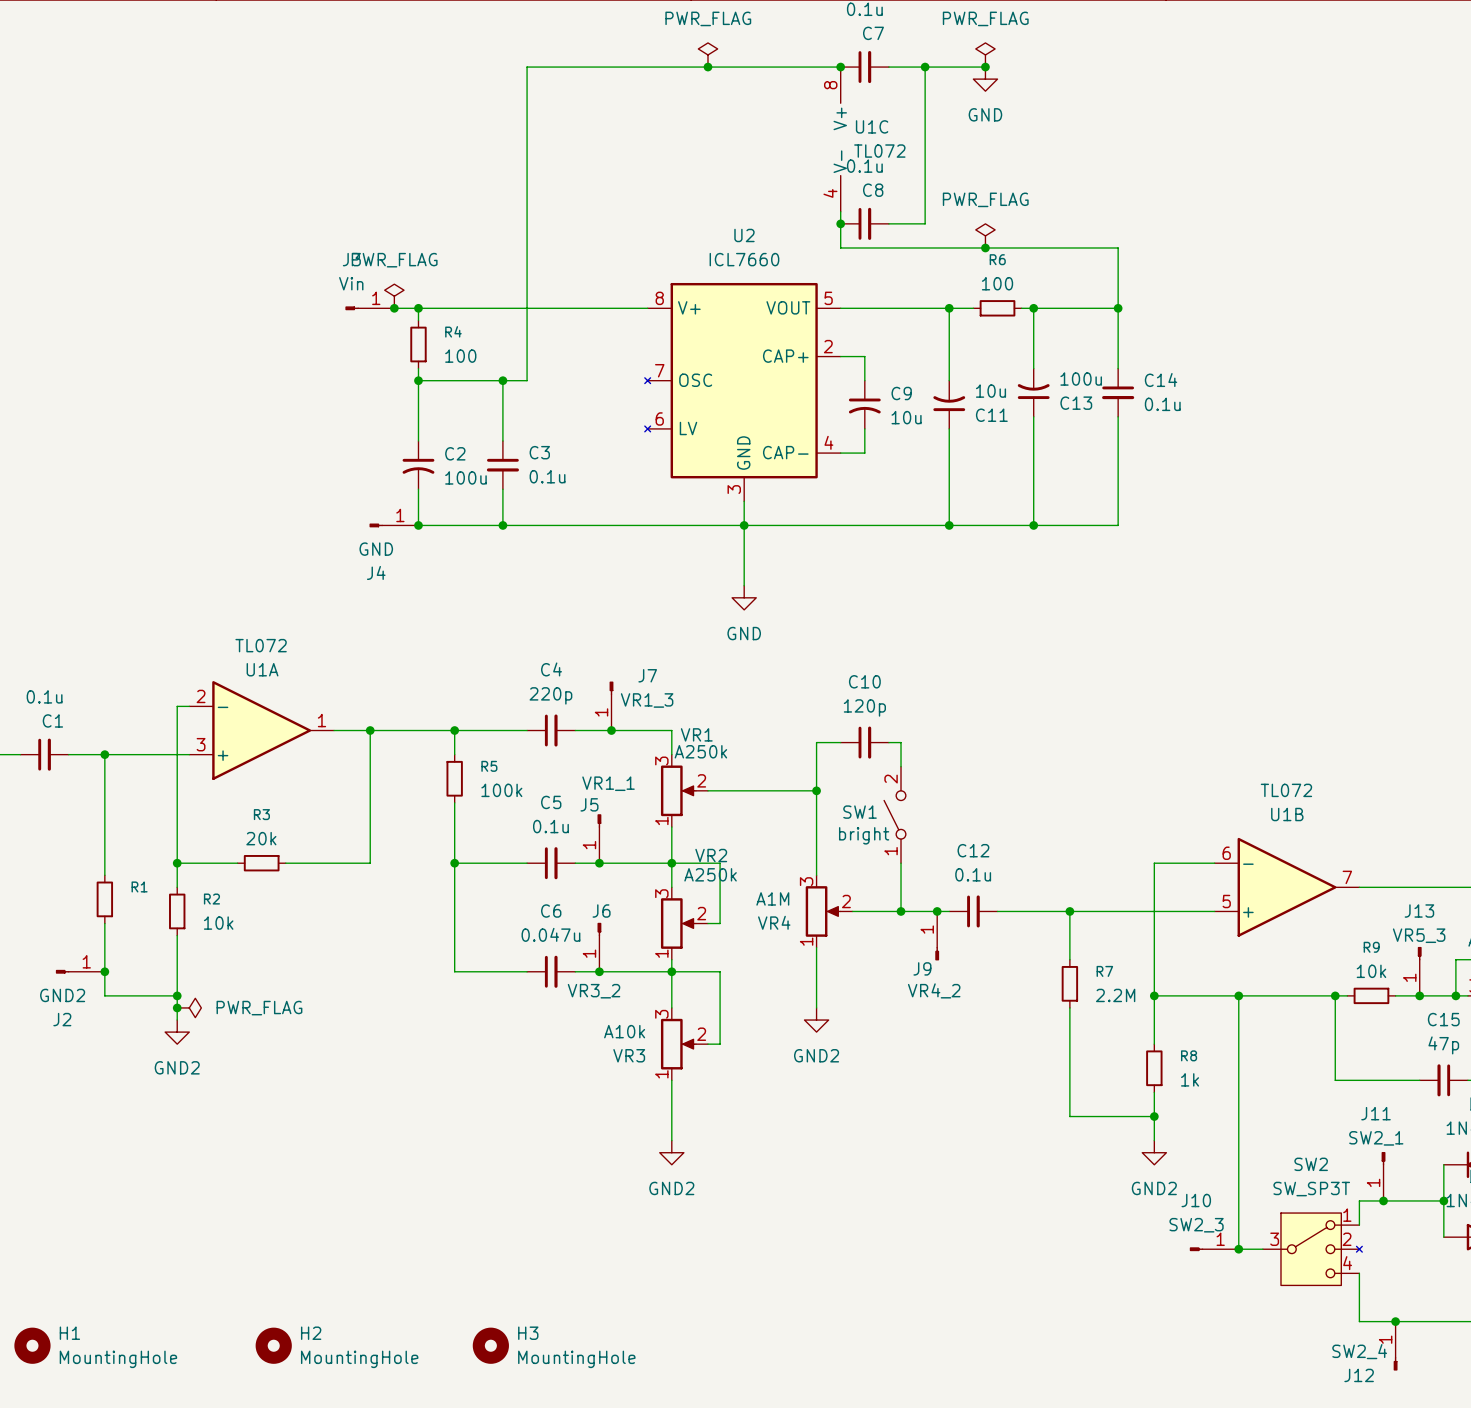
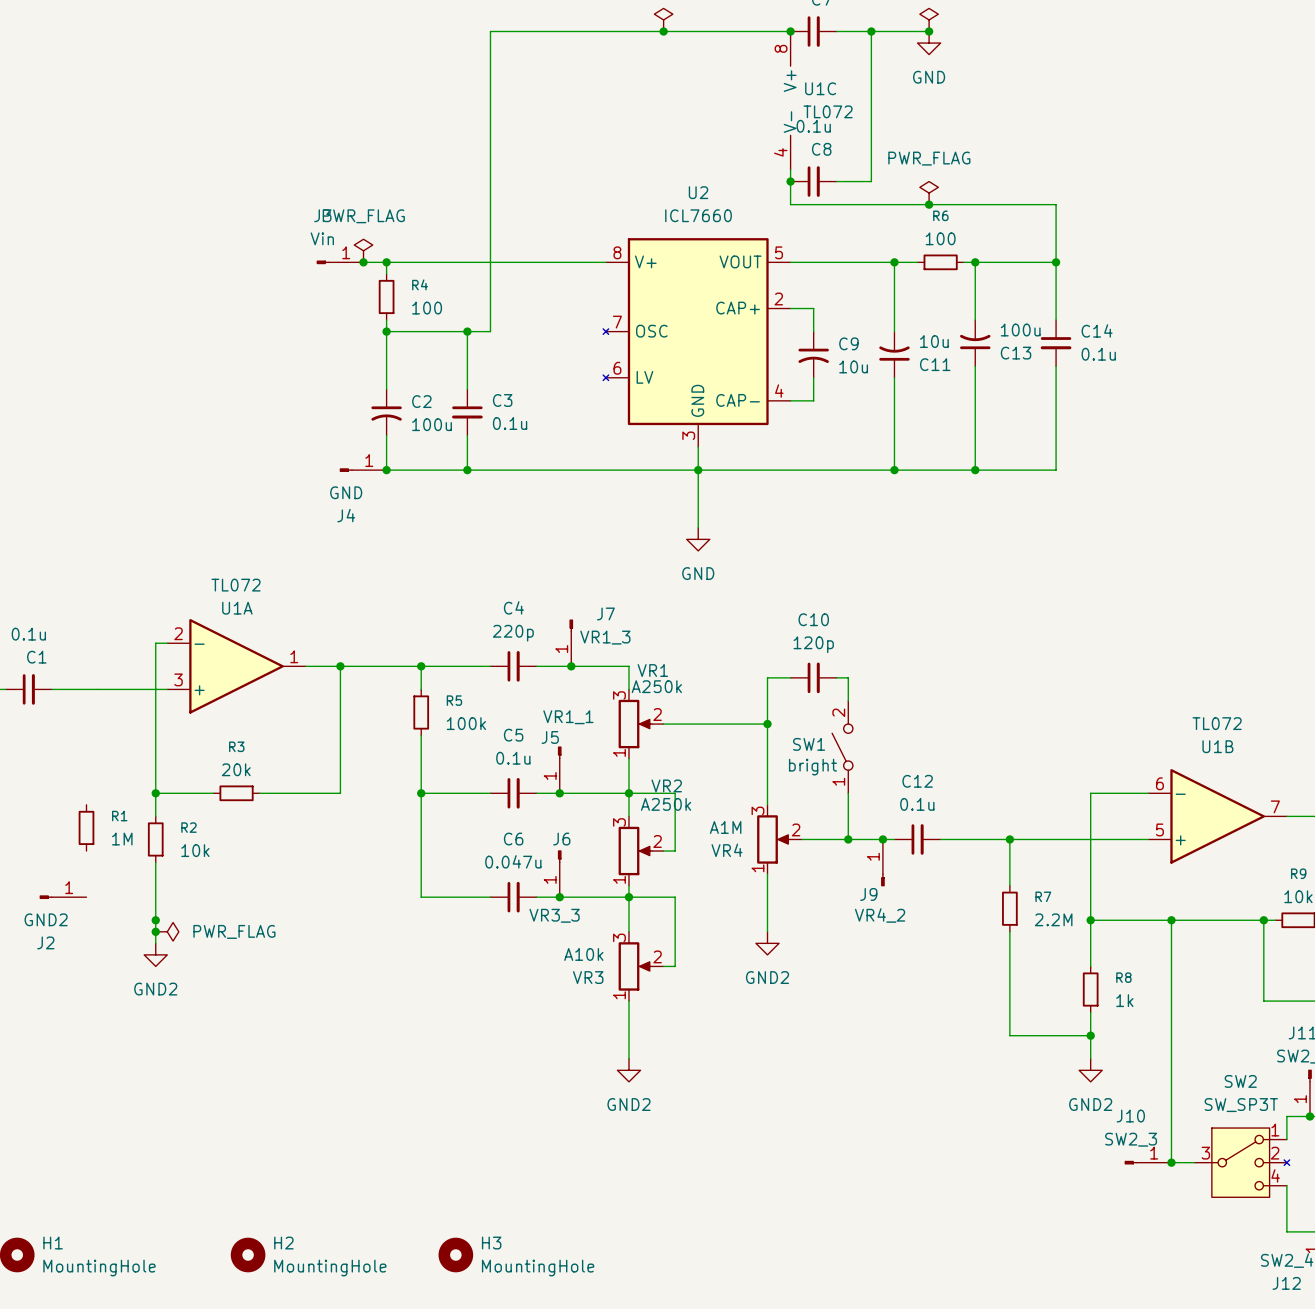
wire: (104, 754) (104, 875) -> none
junction: (104, 754) -> none
R1 value: none -> 1M (122, 839)
wire: (104, 923) (104, 995) (177, 995) -> none
junction: (104, 971) -> none
J6 value: VR3_2 (594, 991) -> VR3_3 (554, 915)

